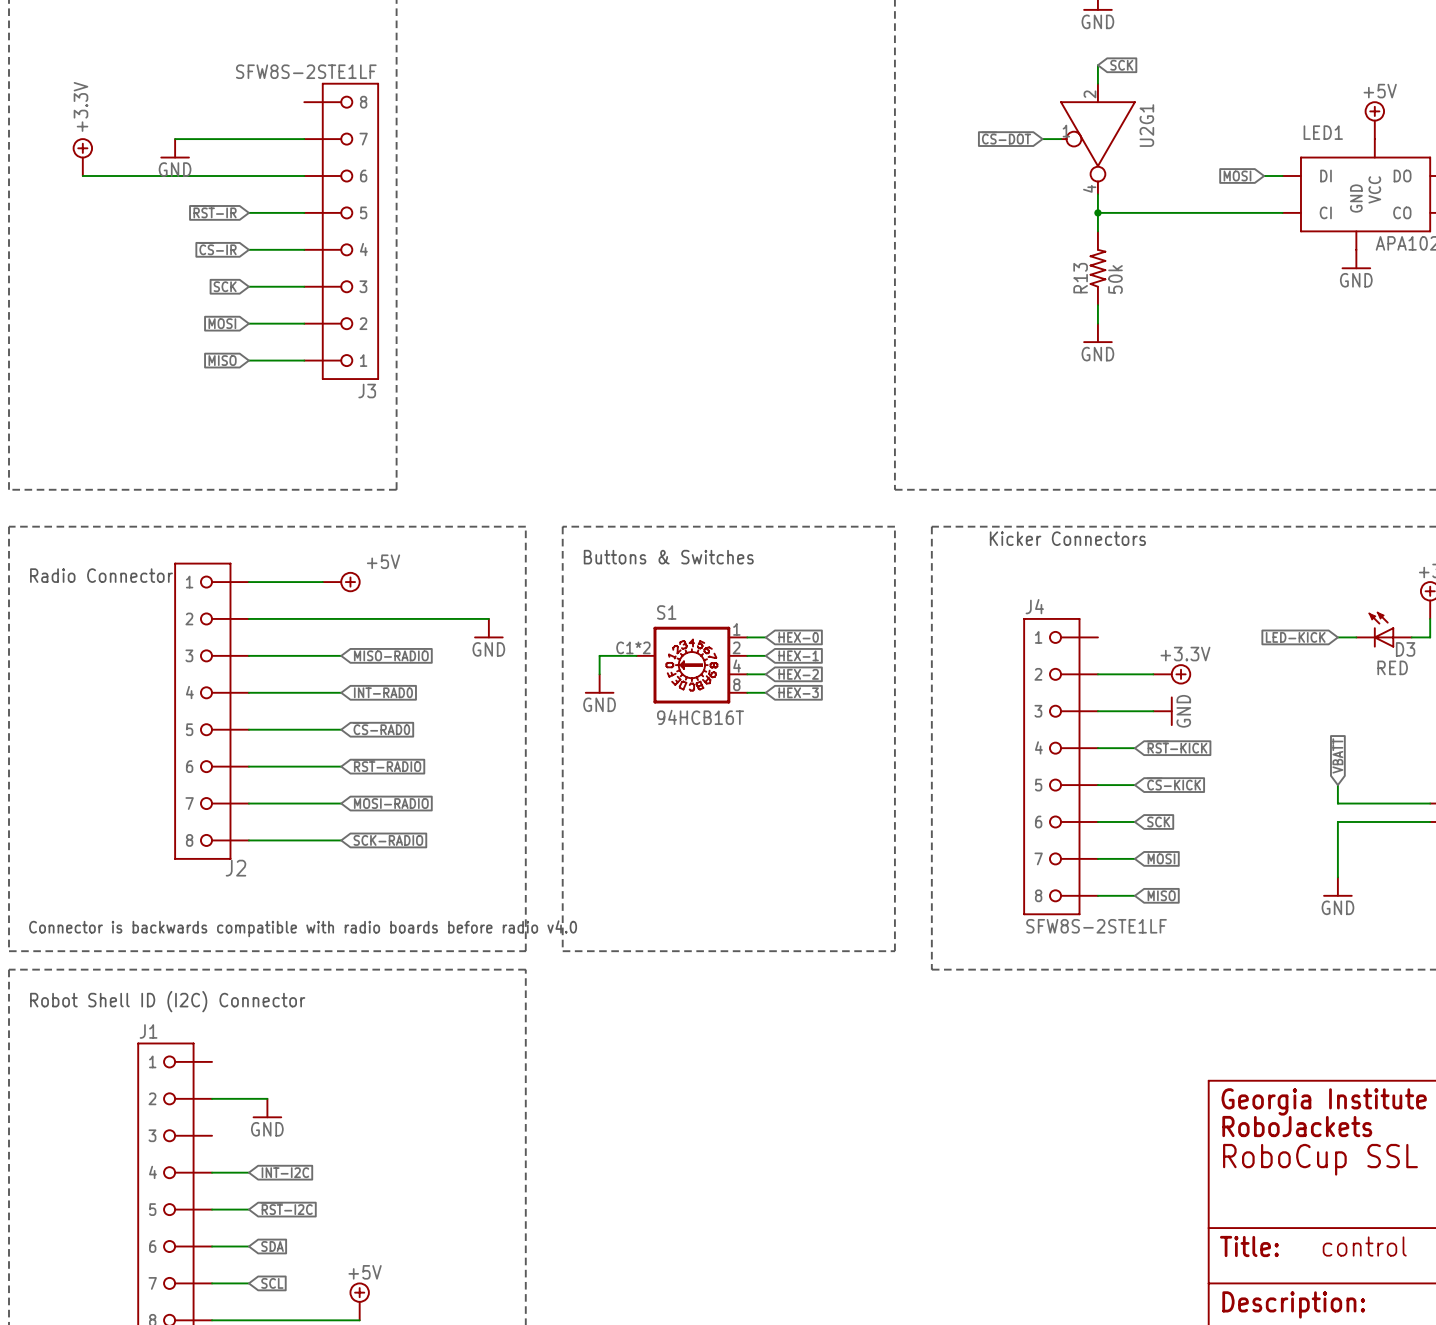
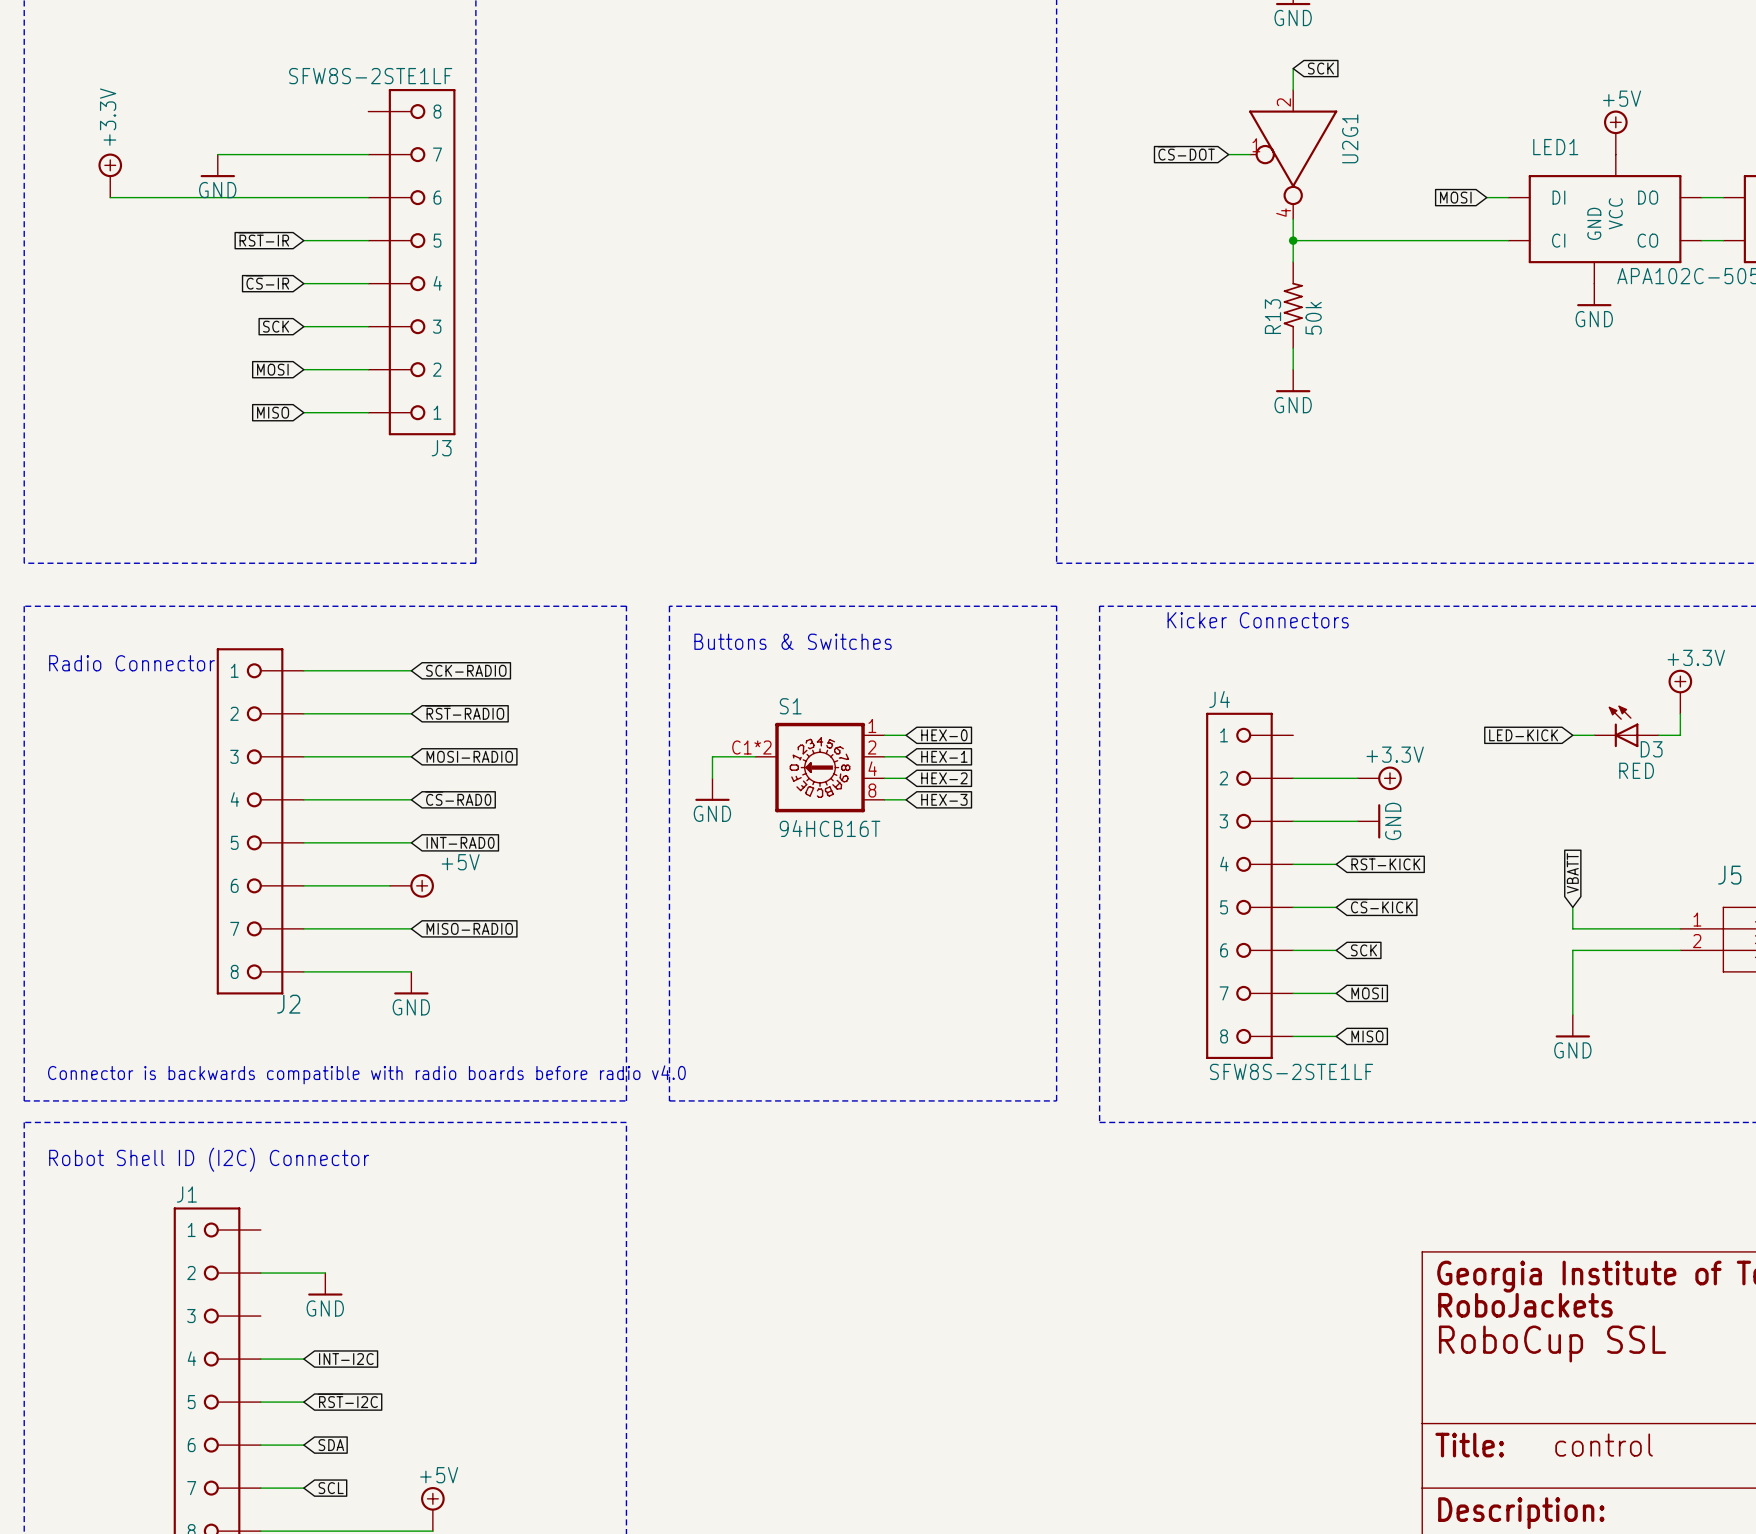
power symbol: +5V (341, 582) -> none
global label: none -> SCK-RADIO (466, 670)
wire: (341, 618) (488, 618) -> none
power symbol: GND (488, 628) -> none
global label: MISO-RADIO (391, 655) -> MOSI-RADIO (469, 756)
global label: INT-RAD0 (383, 692) -> ~{CS}-RAD0 (458, 798)
global label: ~{CS}-RAD0 (381, 728) -> INT-RAD0 (460, 842)
global label position: ~{RST}-RADIO (387, 765) -> ~{RST}-RADIO (464, 712)
power symbol: none -> +5V (411, 885)
global label: MOSI-RADIO (391, 803) -> MISO-RADIO (469, 928)
global label: SCK-RADIO (388, 840) -> none
power symbol: none -> GND (411, 983)

